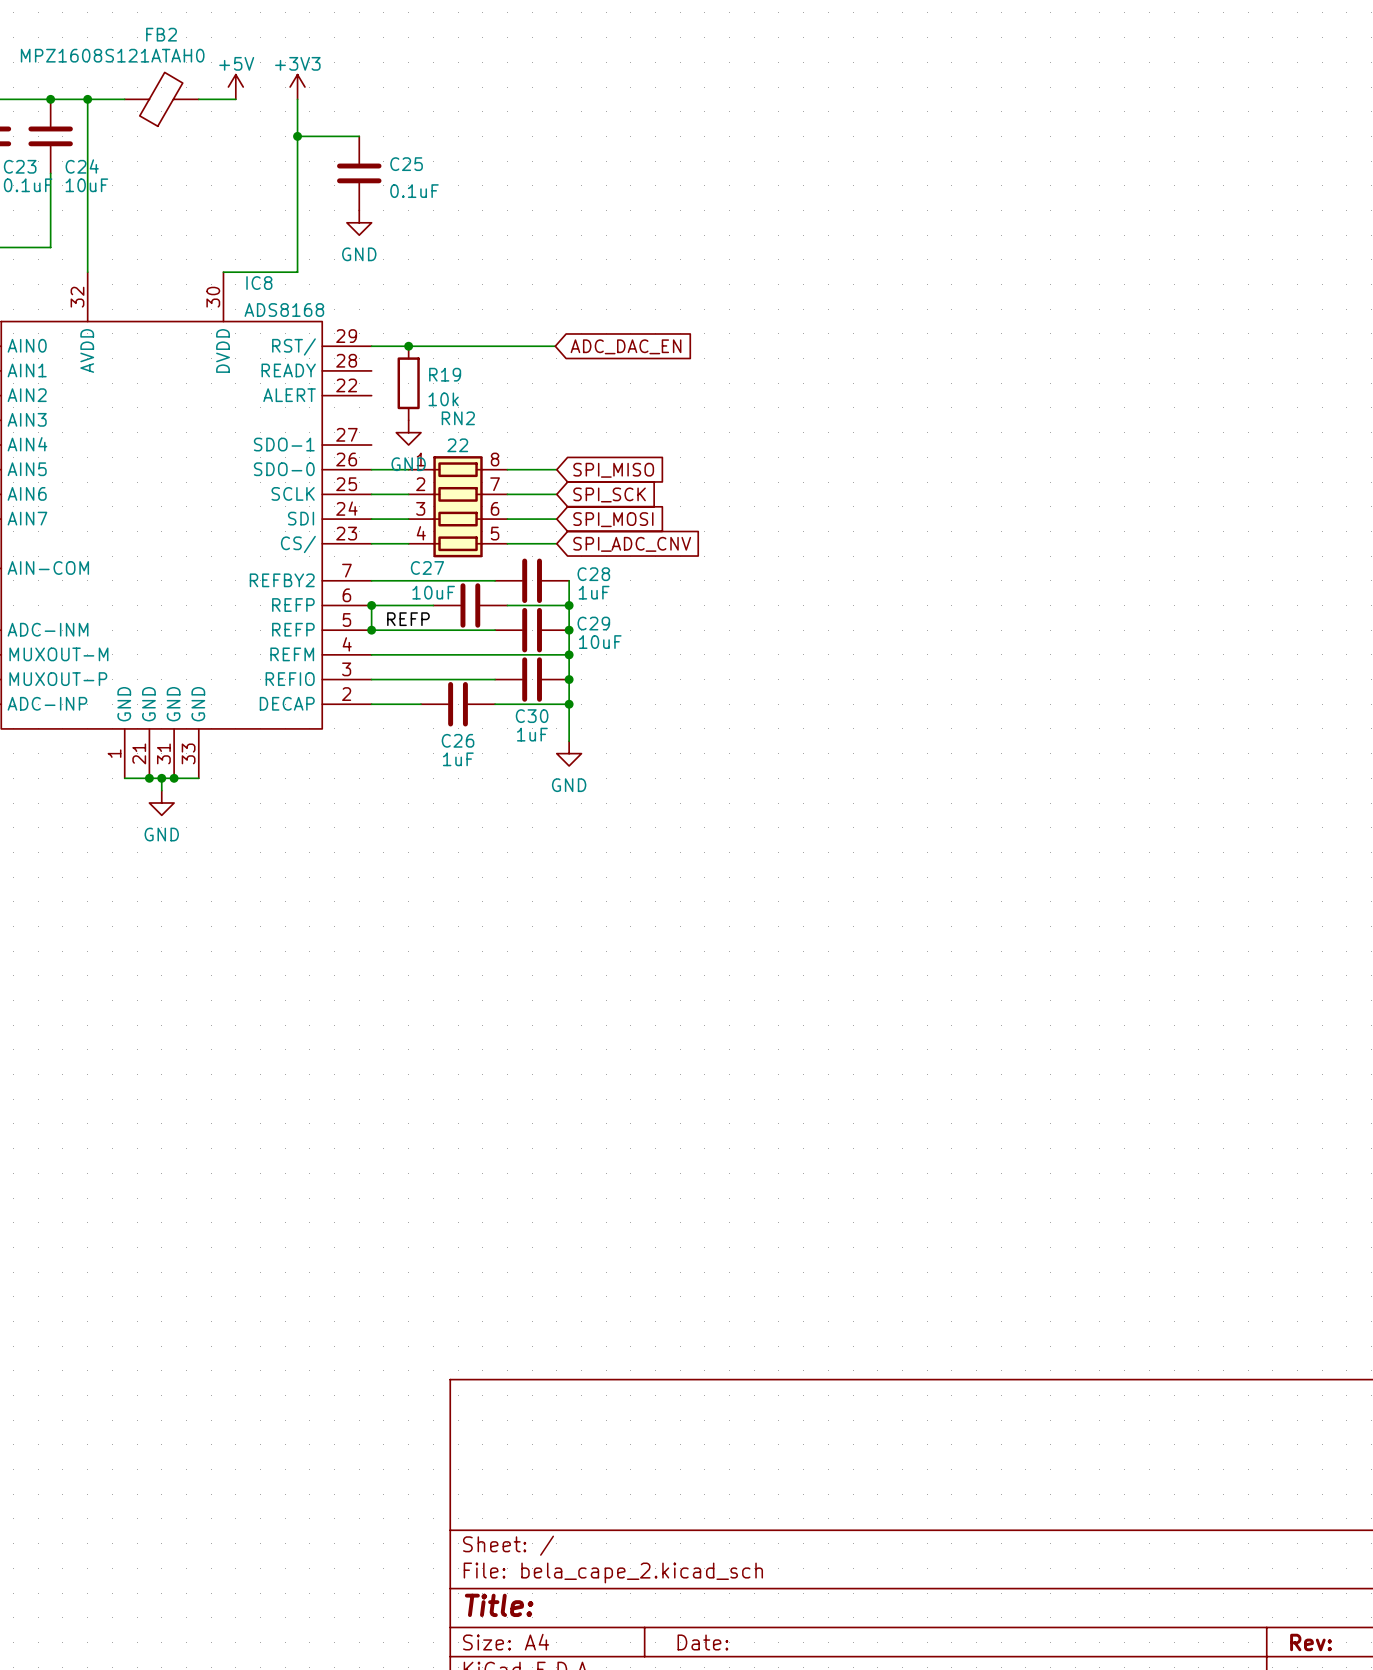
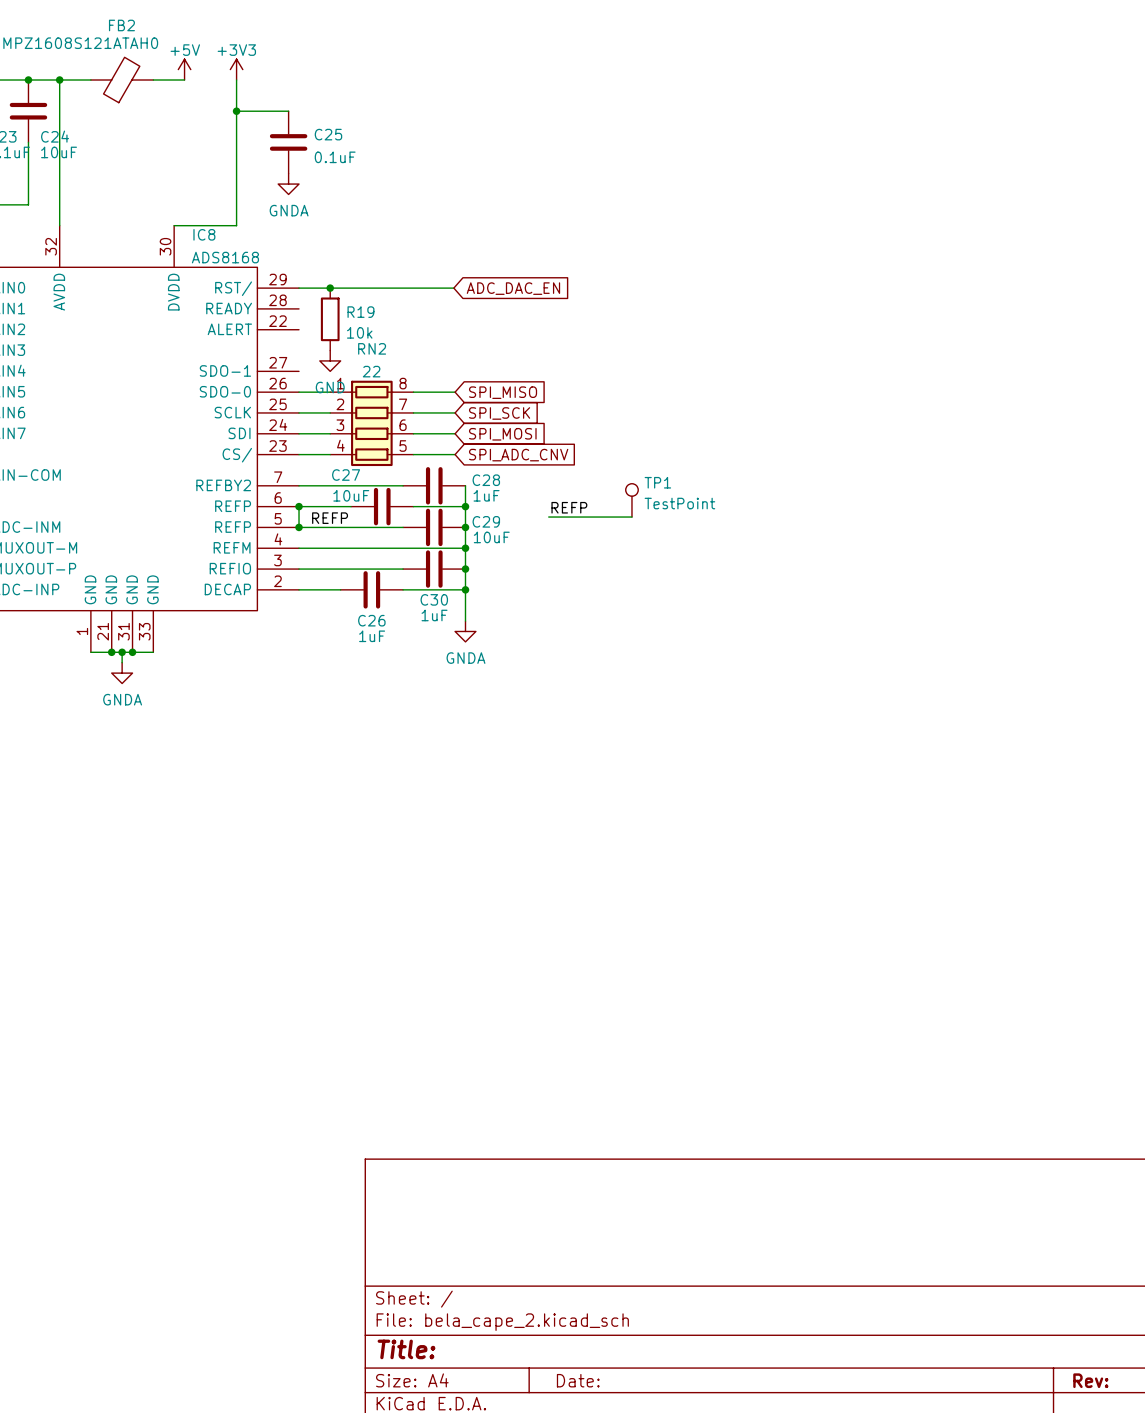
power symbol: GND (359, 222) -> GNDA (288, 184)
TP1: none -> TestPoint (631, 500)
label: none -> REFP (569, 507)
wire: none -> (548, 517) (631, 517)
power symbol: GND (569, 753) -> GNDA (465, 631)
power symbol: GND (161, 803) -> GNDA (122, 673)

